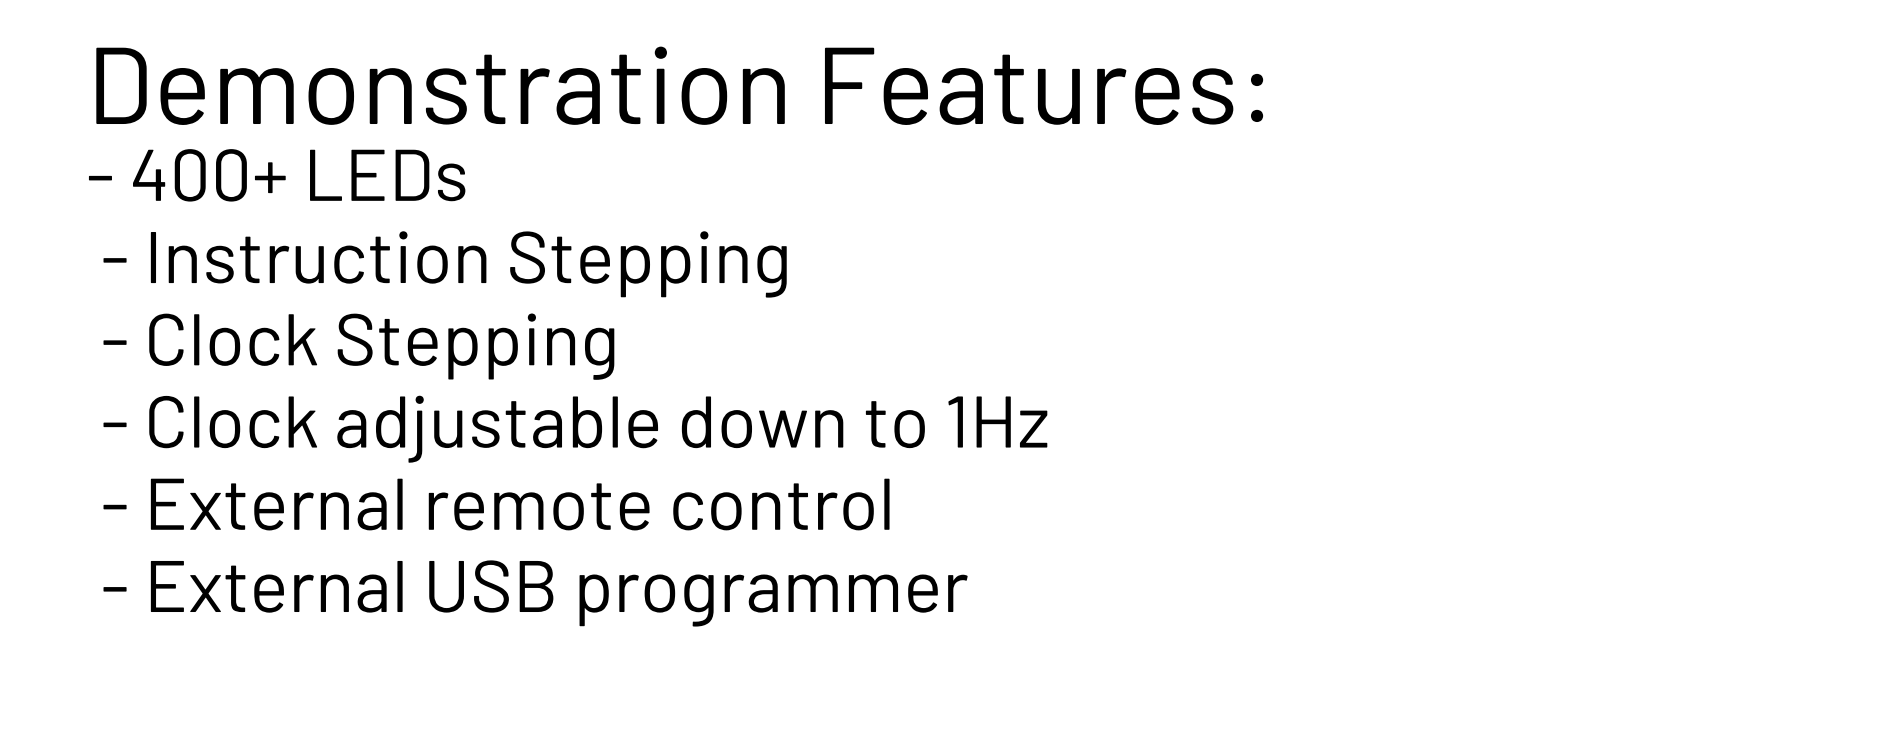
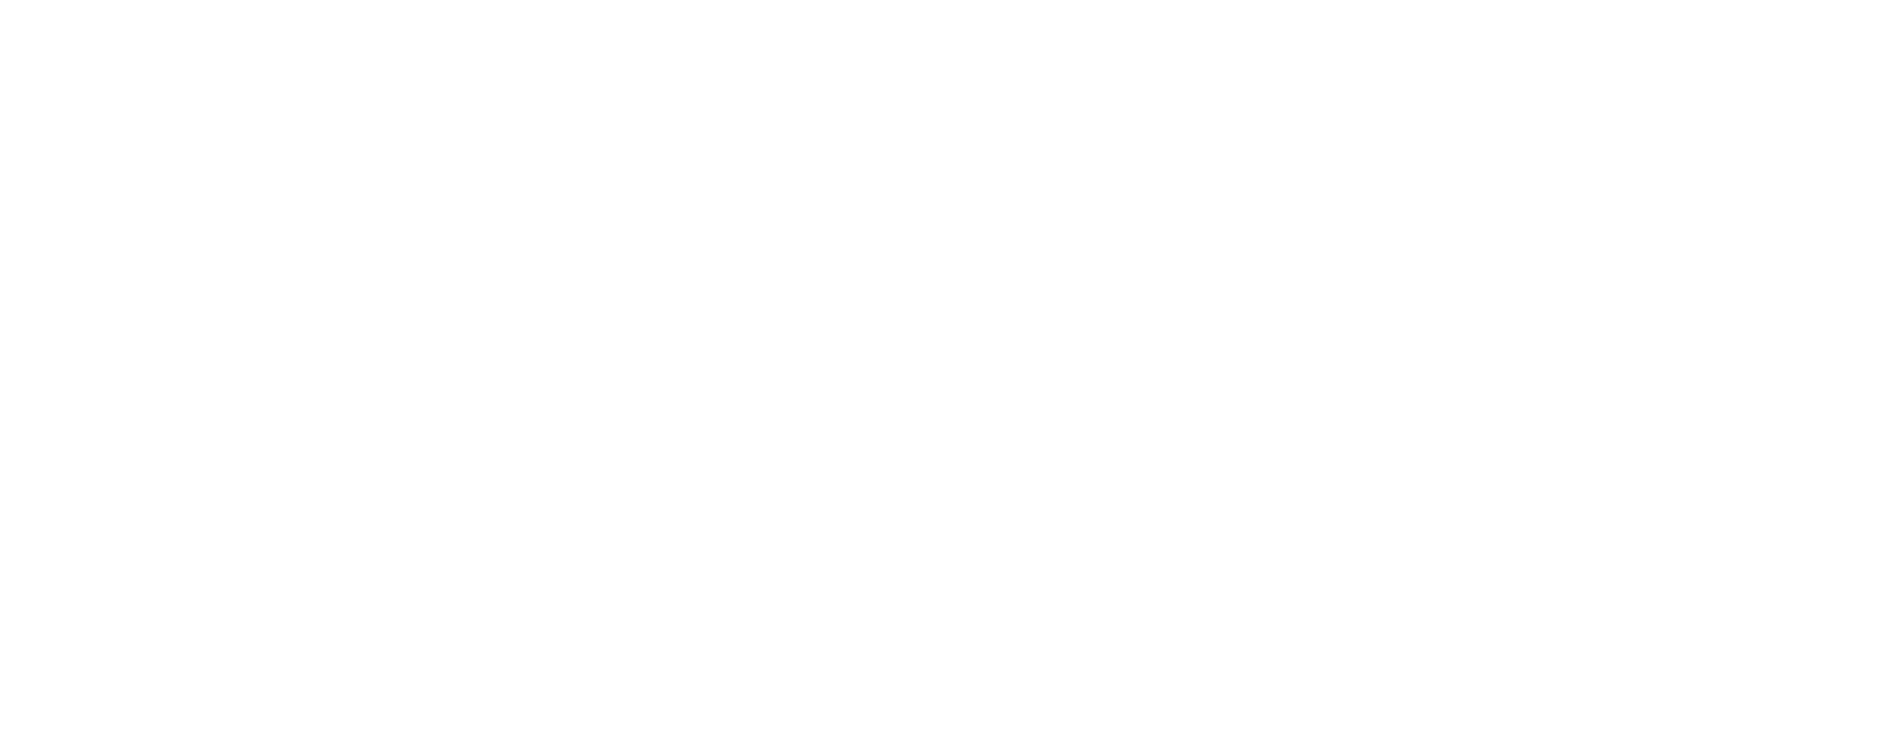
text: Demonstration Features: (679, 85) -> none
text: - 400+ LEDs (277, 175) -> none
text: - Instruction Stepping (445, 264) -> none
text: - Clock Stepping (358, 346) -> none
text: - Clock adjustable down to 1Hz (575, 429) -> none
text: - External remote control (496, 504) -> none
text: - External USB programmer (535, 593) -> none

